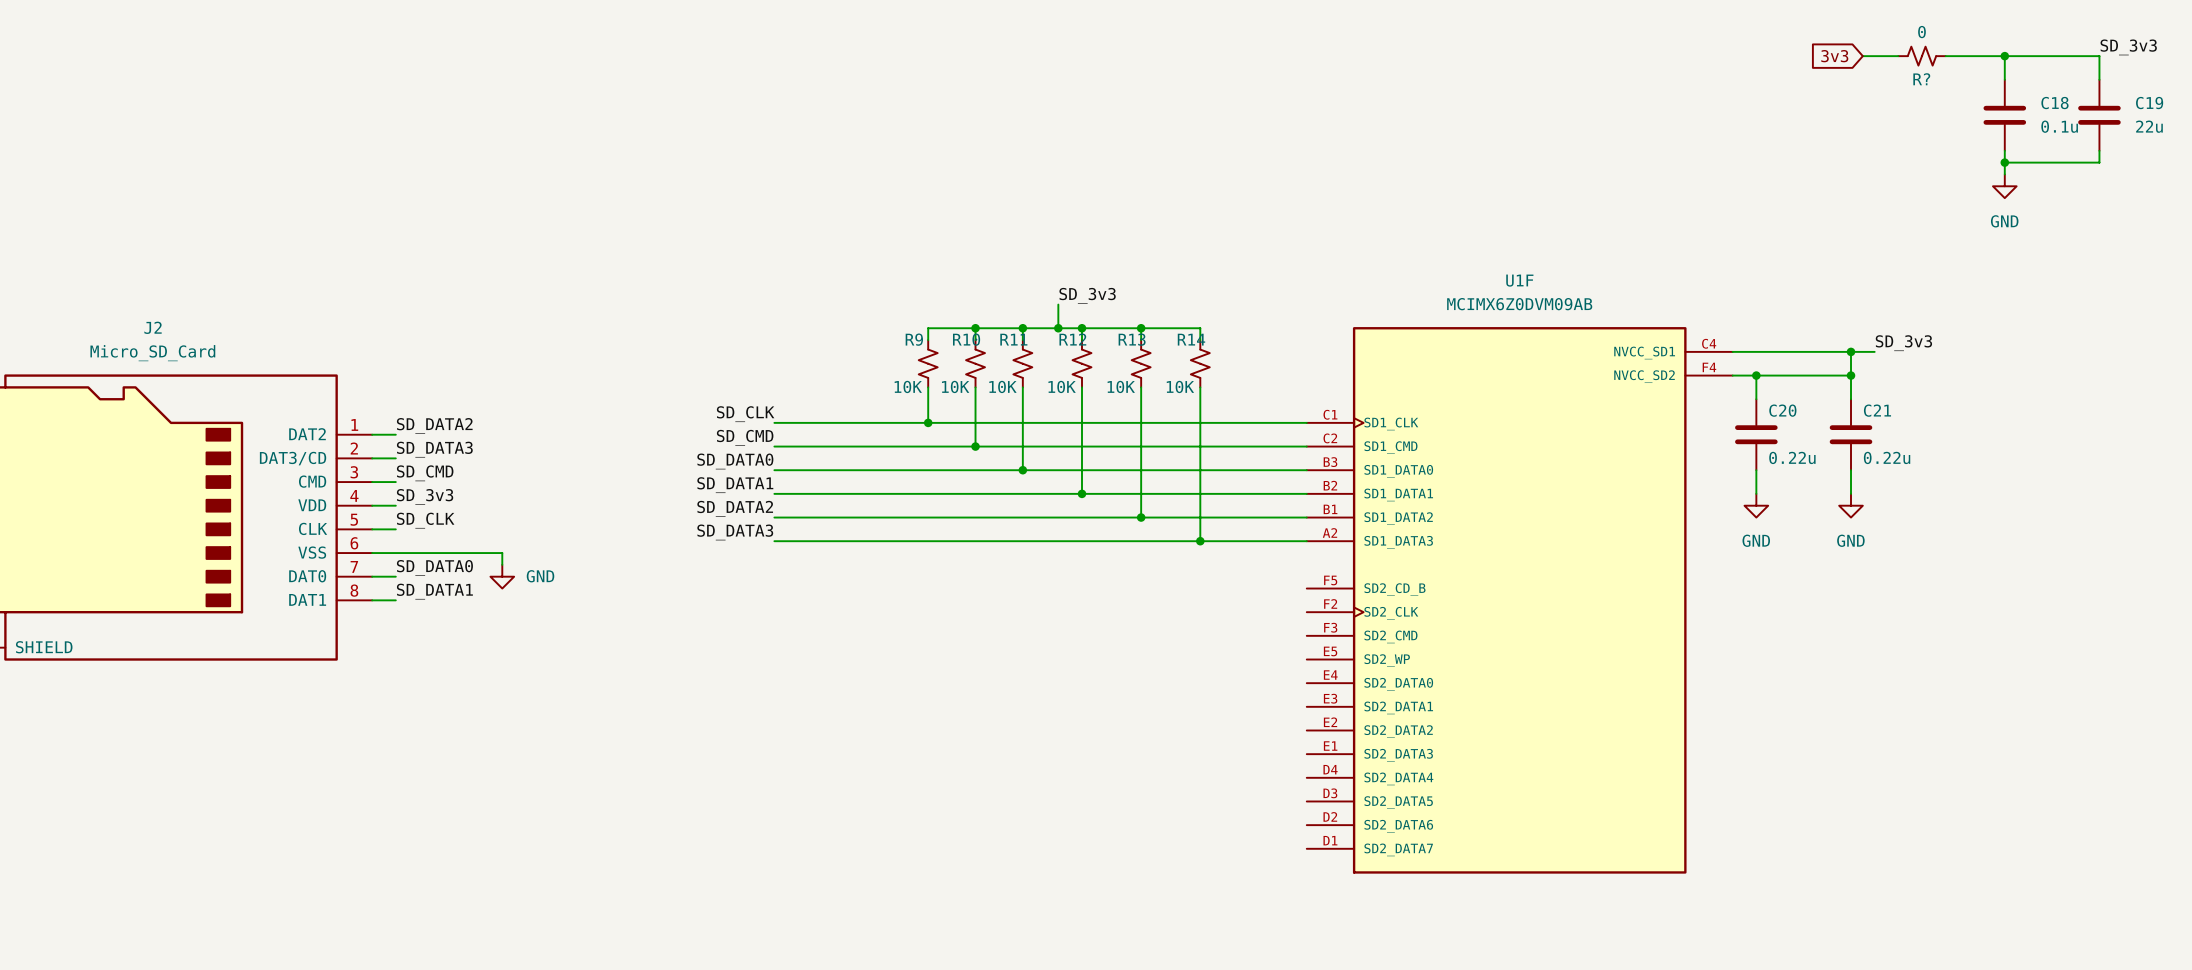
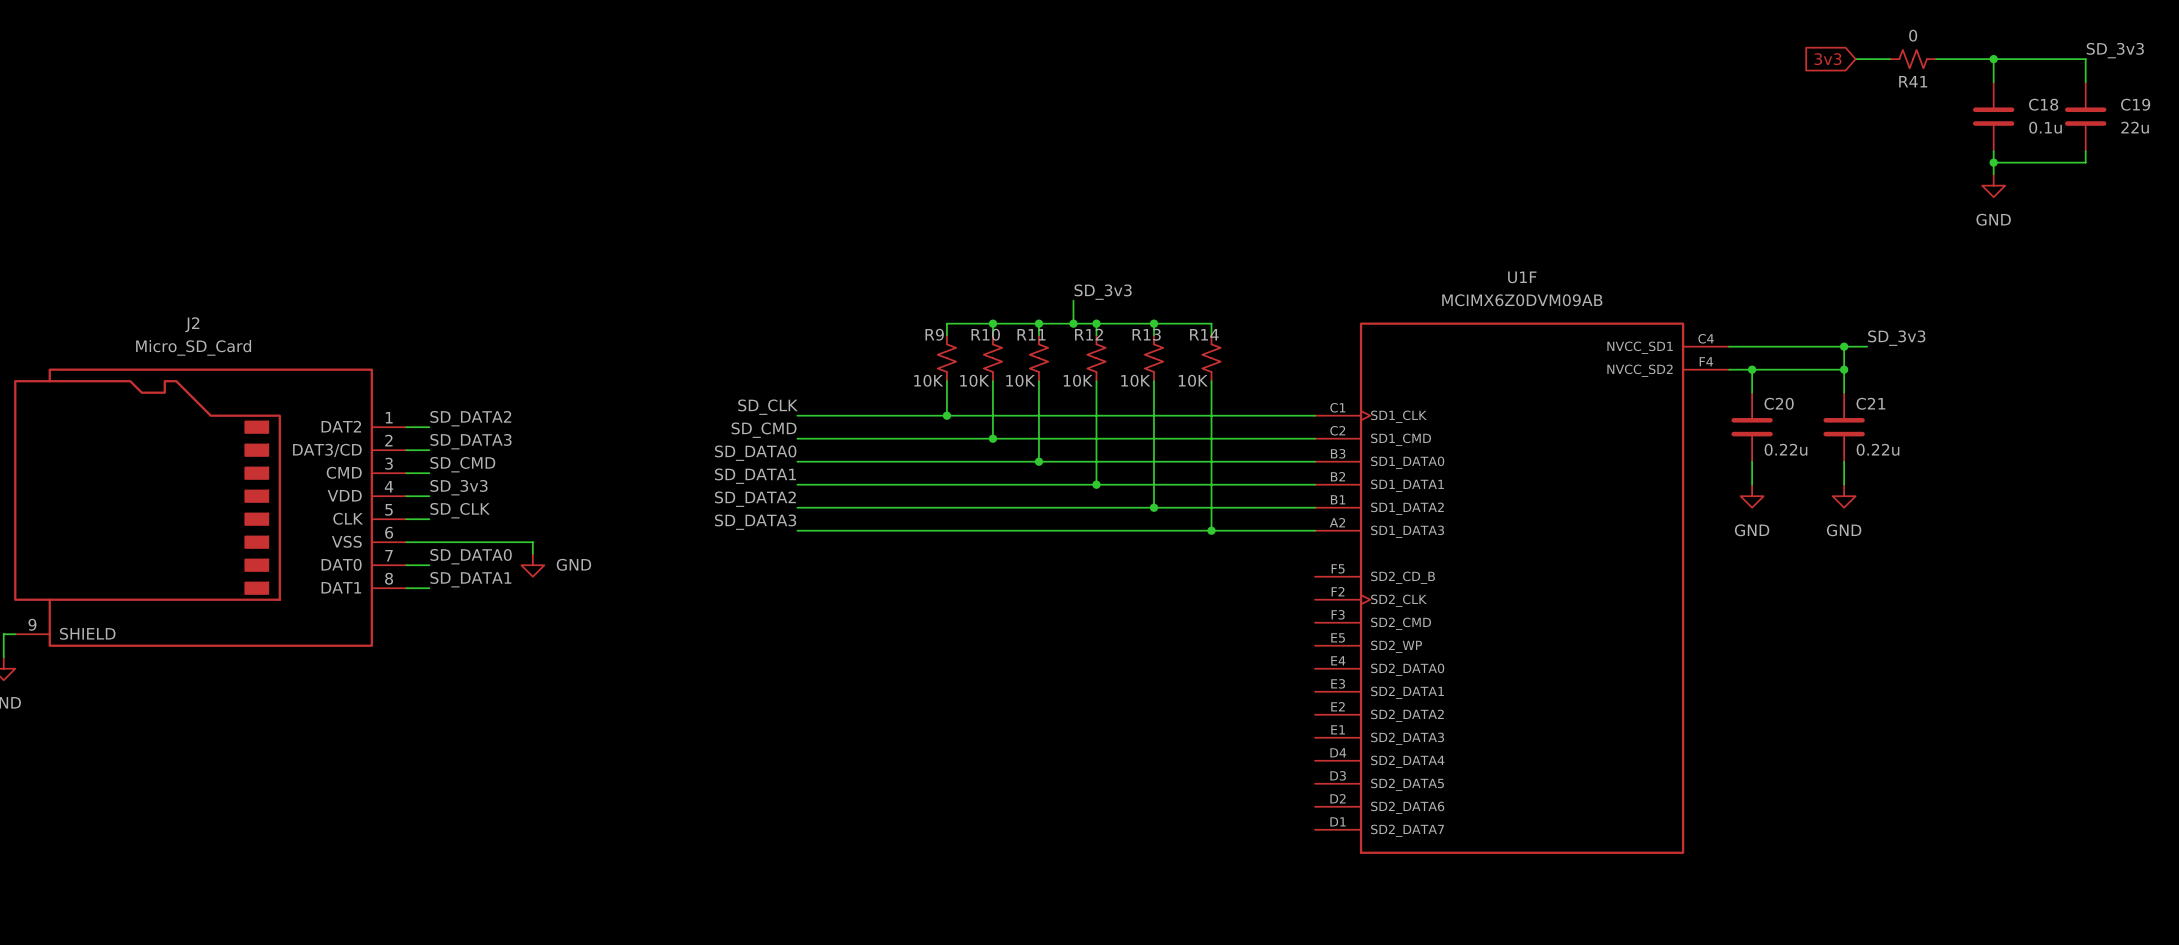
R? name: R? (1921, 79) -> R41 (1913, 81)

